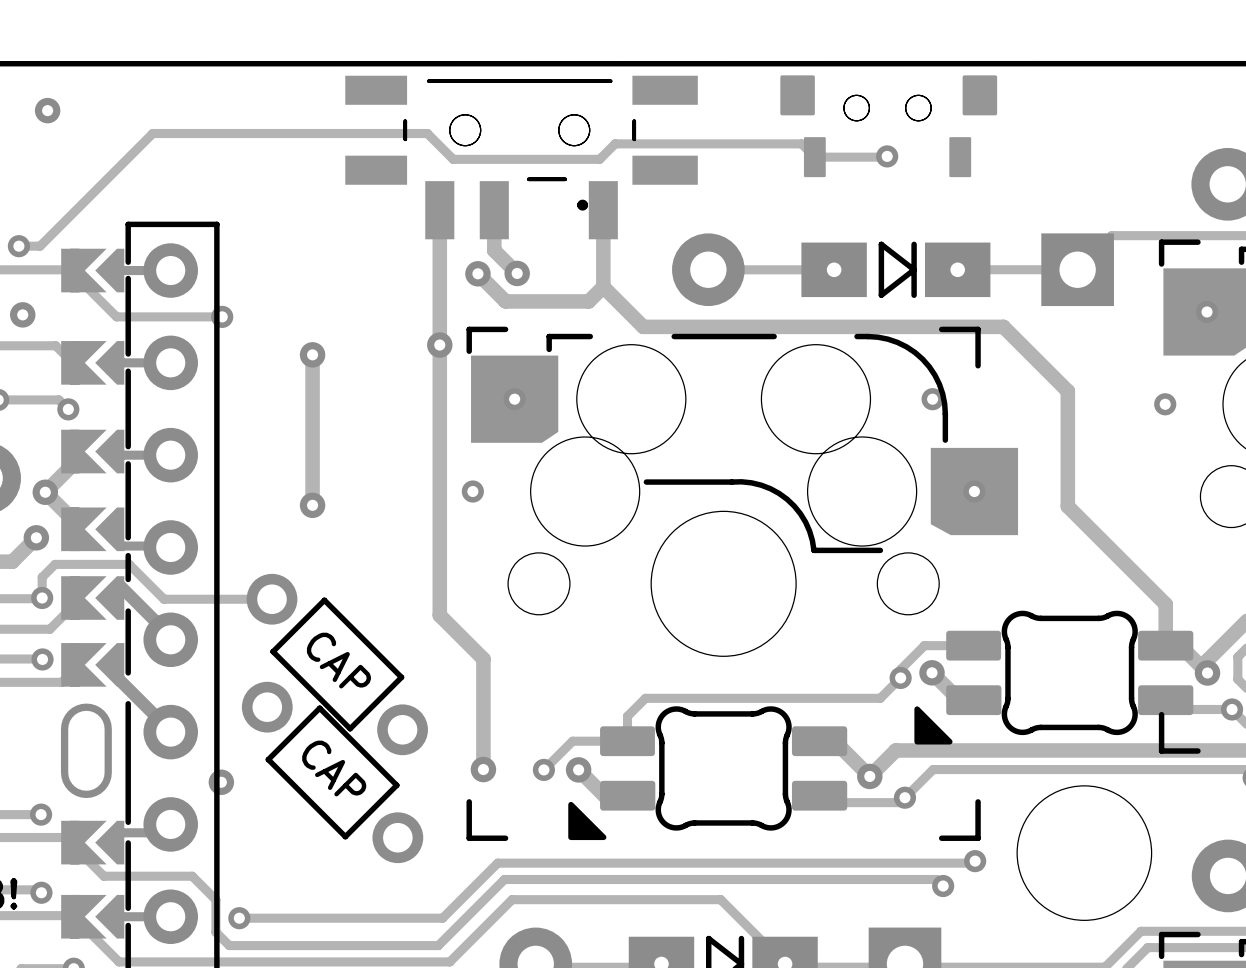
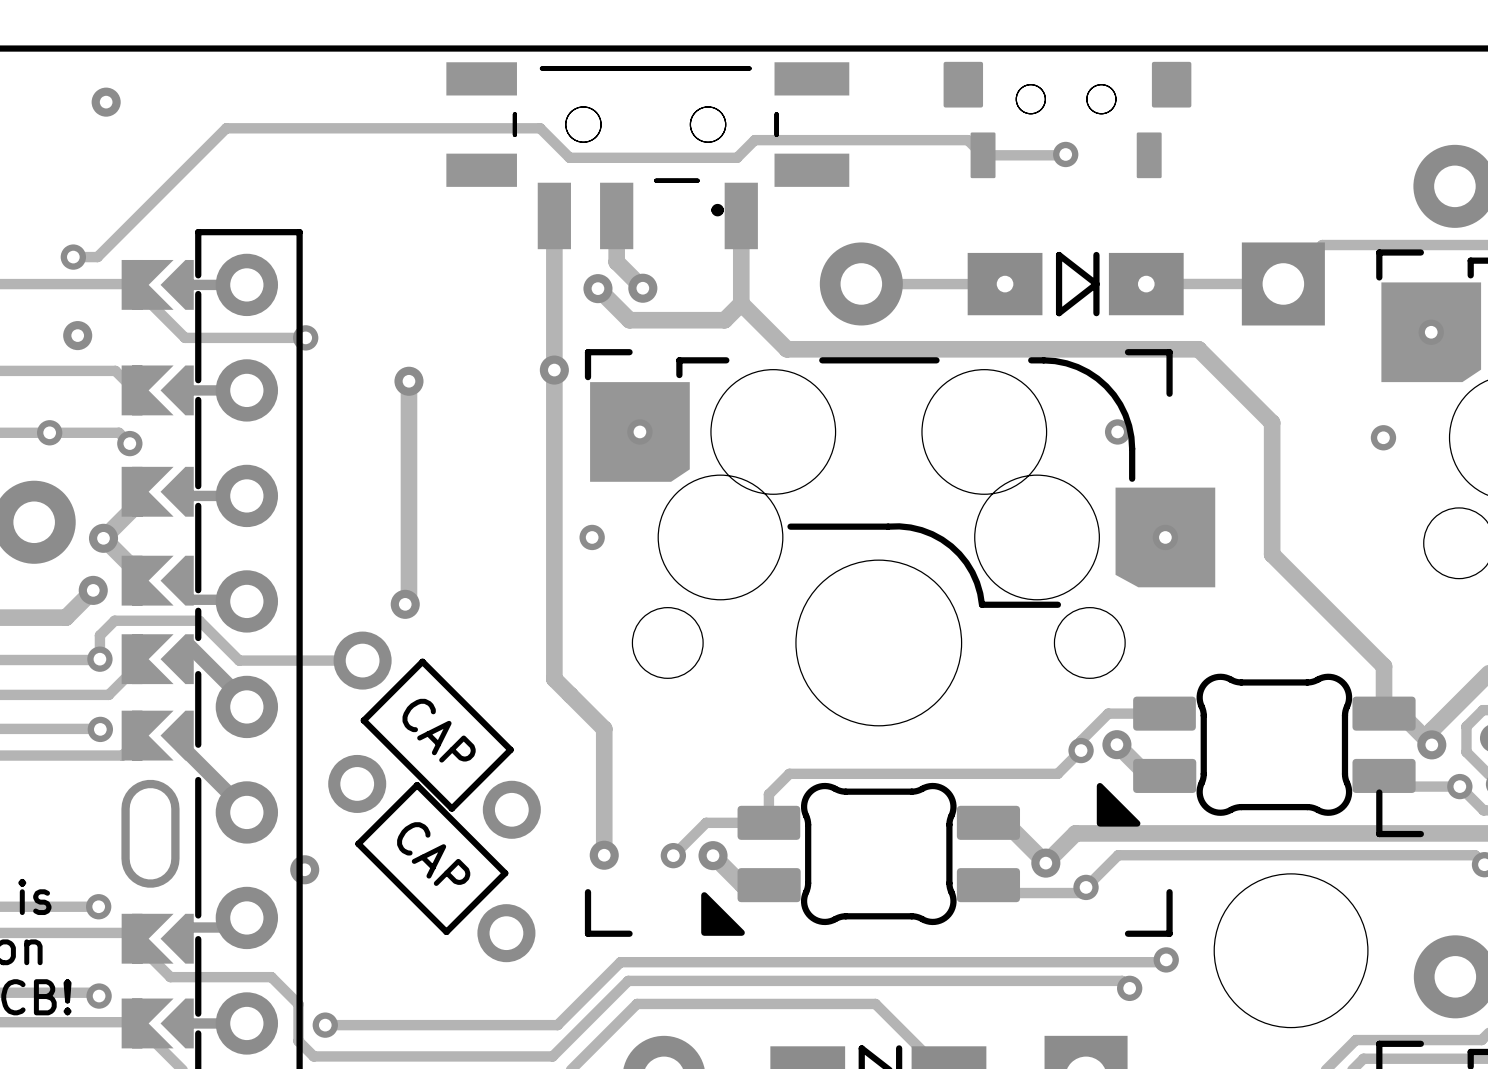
track: none -> (408, 553) (408, 600) (405, 604)
via position: (312, 505) -> (405, 604)

